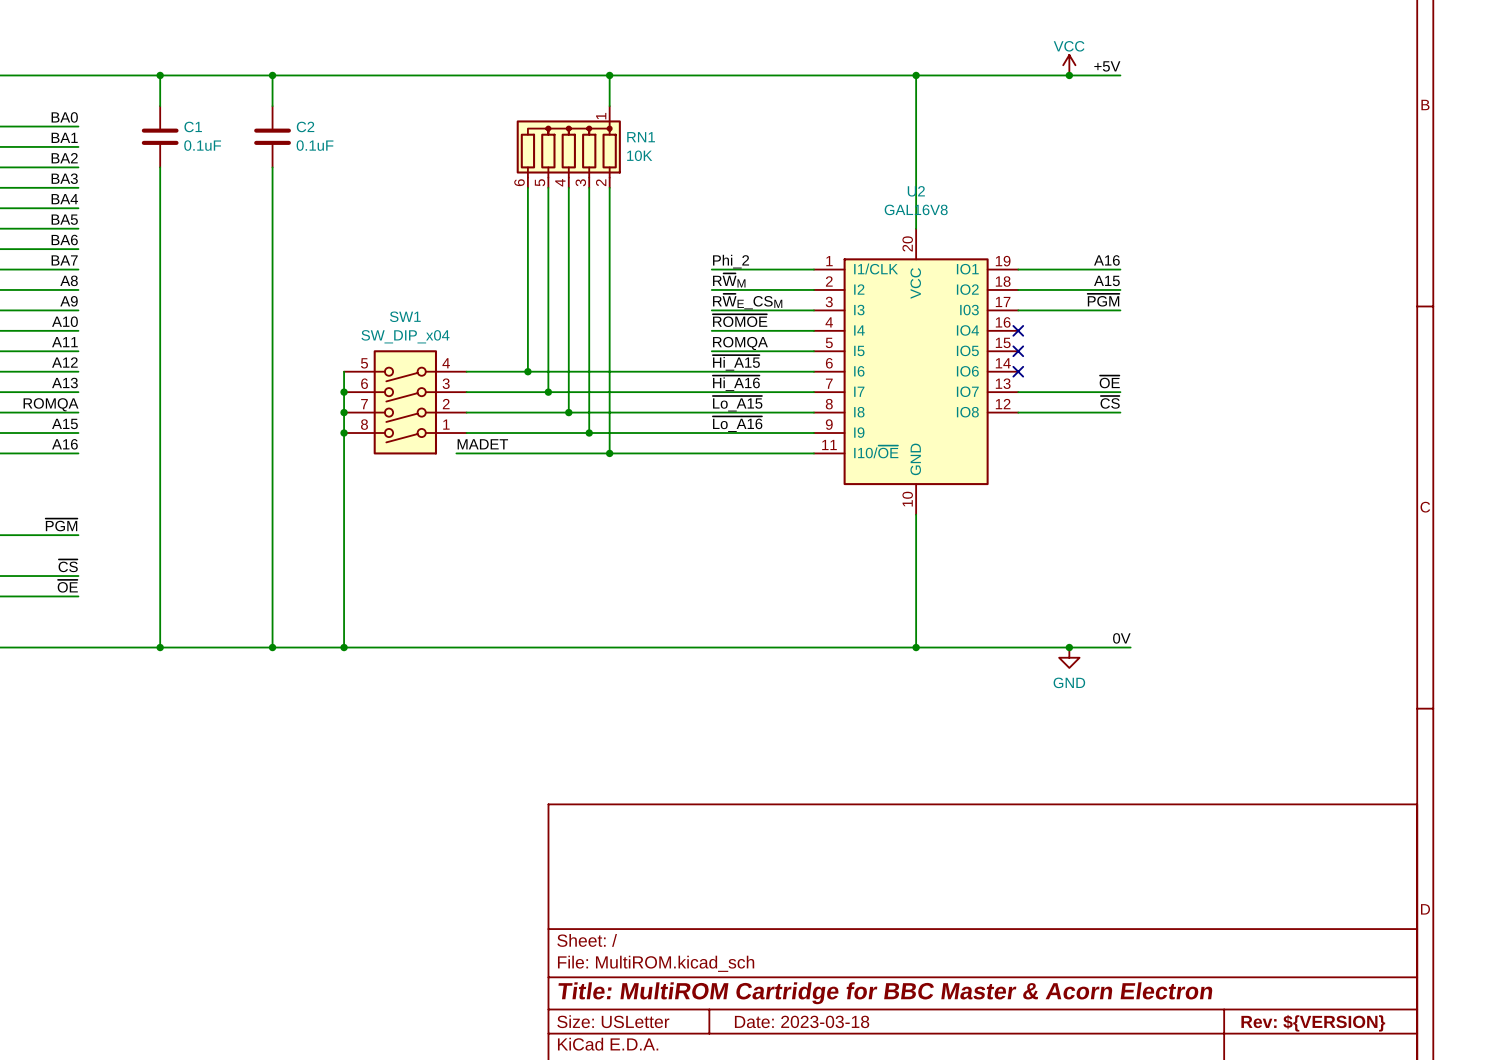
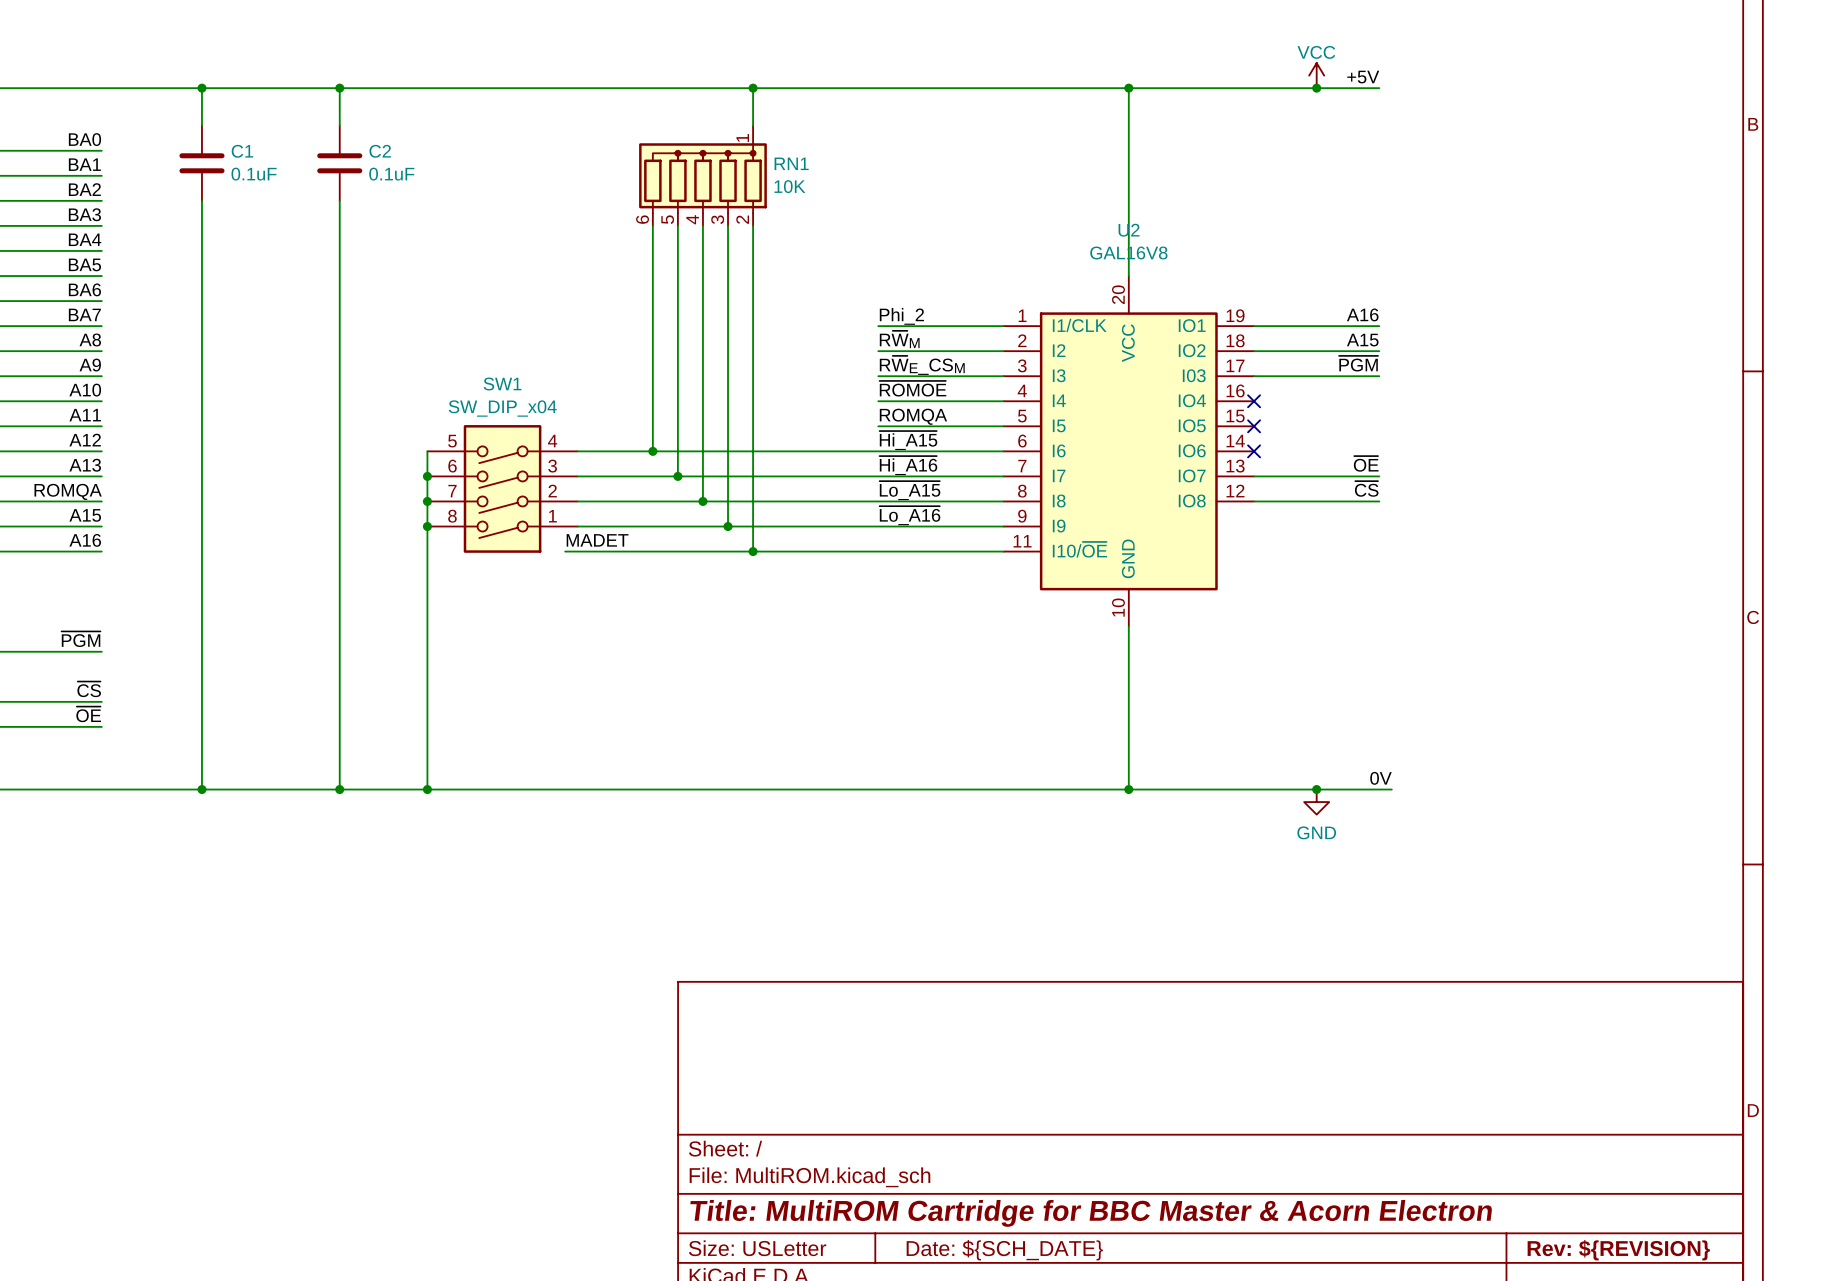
title block: Date: 2023-03-18 (802, 1021) -> Date: ${SCH_DATE} (1004, 1250)
title block: Rev: ${VERSION} (1313, 1023) -> Rev: ${REVISION} (1618, 1250)

